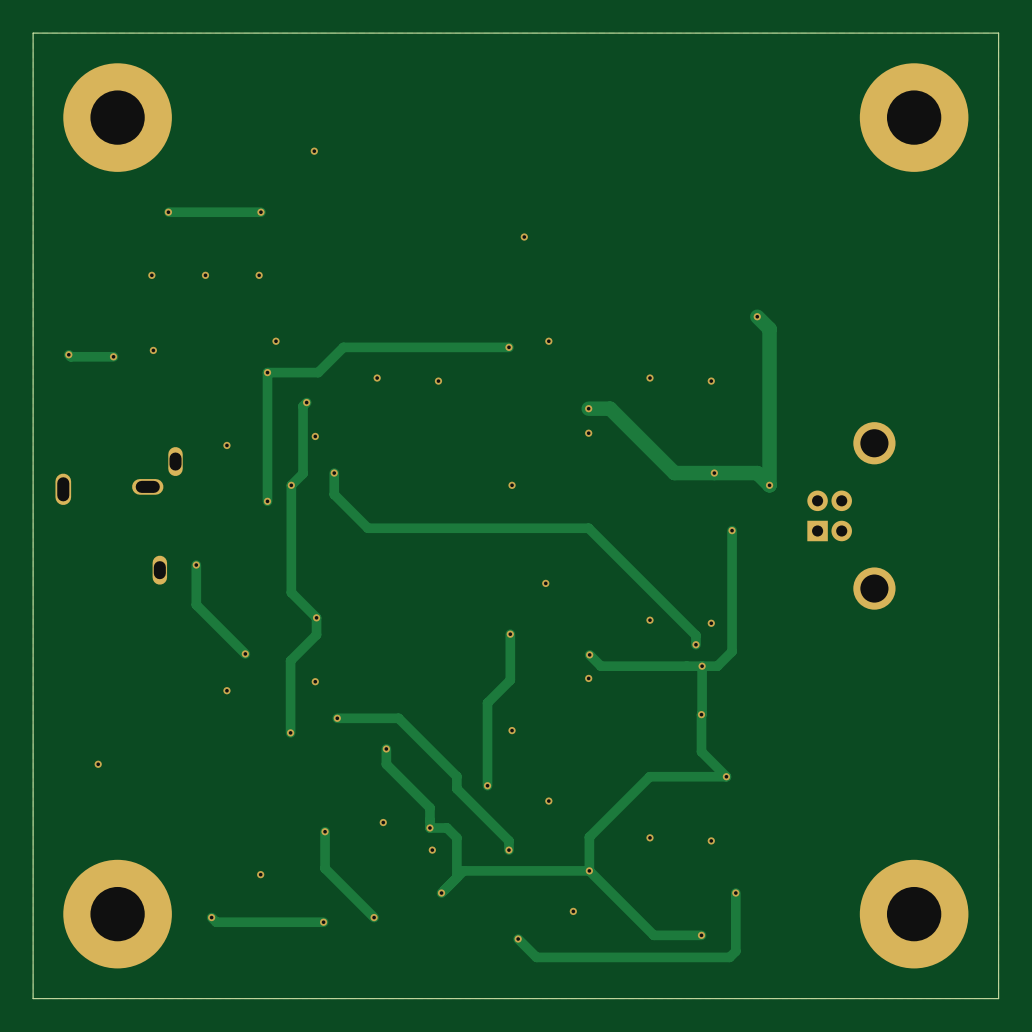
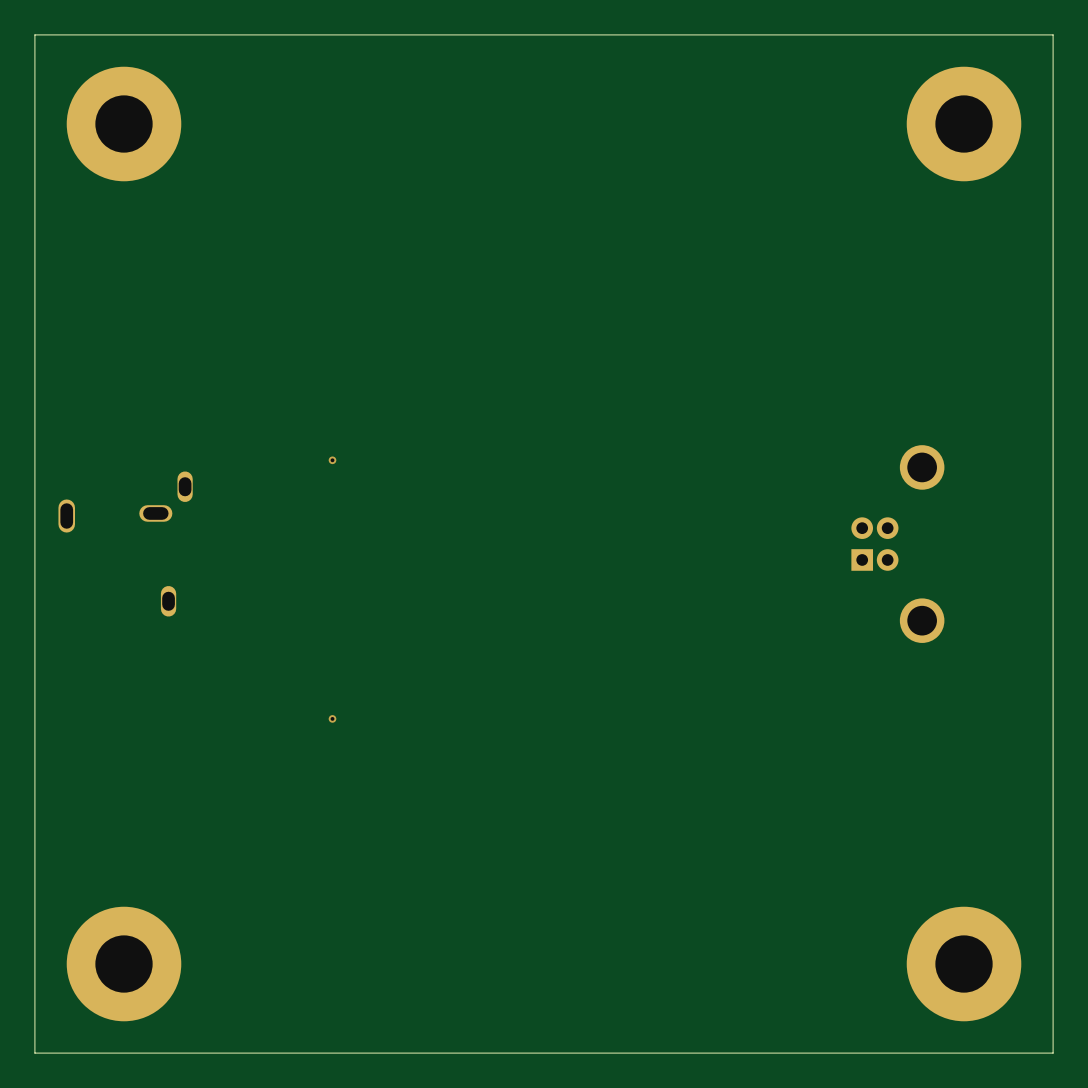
via: (314, 151) -> none
via: (168, 212) -> none
track: (260, 212) (168, 212) -> none
via: (260, 212) -> none
via: (524, 237) -> none
via: (151, 275) -> none
via: (205, 275) -> none
via: (259, 275) -> none
track: (757, 316) (769, 328) (769, 485) (757, 473) (674, 473) (610, 408) (588, 408) -> none
via: (757, 316) -> none
via: (276, 341) -> none
via: (548, 341) -> none
track: (508, 347) (343, 347) (318, 372) (267, 372) (267, 501) -> none
via: (508, 347) -> none
via: (153, 350) -> none
track: (68, 354) (70, 356) (113, 356) -> none
via: (68, 354) -> none
via: (113, 356) -> none
via: (267, 372) -> none
via: (377, 378) -> none
via: (649, 378) -> none
via: (438, 381) -> none
via: (711, 381) -> none
track: (306, 402) (303, 406) (303, 473) (291, 485) (291, 592) (316, 617) (316, 634) (290, 660) (290, 732) -> none
via: (306, 402) -> none
via: (588, 408) -> none
via: (588, 433) -> none
via: (226, 445) -> none
track: (334, 473) (334, 494) (367, 528) (588, 528) (695, 635) (695, 644) -> none
via: (334, 473) -> none
via: (714, 473) -> none
via: (291, 485) -> none
via: (512, 485) -> none
via: (769, 485) -> none
via: (267, 501) -> none
track: (732, 530) (732, 651) (717, 666) (600, 666) (589, 654) -> none
via: (732, 530) -> none
track: (196, 565) (196, 604) (245, 653) -> none
via: (196, 565) -> none
via: (545, 583) -> none
via: (316, 617) -> none
via: (649, 620) -> none
via: (711, 623) -> none
track: (510, 634) (510, 680) (487, 702) (487, 785) -> none
via: (510, 634) -> none
via: (695, 644) -> none
via: (245, 653) -> none
via: (589, 654) -> none
track: (702, 666) (701, 751) (726, 776) (649, 776) (589, 837) (589, 870) -> none
via: (702, 666) -> none
via: (588, 678) -> none
via: (226, 690) -> none
via: (701, 714) -> none
track: (337, 718) (398, 718) (456, 776) (456, 788) (508, 840) (508, 850) -> none
via: (337, 718) -> none
via: (512, 730) -> none
via: (290, 732) -> none
track: (386, 748) (386, 764) (429, 807) (429, 827) (446, 827) (456, 837) (456, 877) -> none
via: (386, 748) -> none
via: (98, 764) -> none
via: (726, 776) -> none
via: (487, 785) -> none
via: (548, 801) -> none
via: (383, 822) -> none
via: (429, 827) -> none
track: (325, 831) (325, 868) (374, 917) -> none
via: (325, 831) -> none
via: (649, 837) -> none
via: (711, 840) -> none
via: (432, 850) -> none
via: (508, 850) -> none
track: (589, 870) (653, 935) (701, 935) -> none
track: (589, 870) (463, 870) (441, 893) -> none
via: (589, 870) -> none
via: (260, 874) -> none
via: (441, 893) -> none
track: (735, 893) (735, 951) (729, 957) (536, 957) (518, 939) -> none
via: (735, 893) -> none
via: (573, 911) -> none
track: (211, 917) (216, 922) (323, 922) -> none
via: (211, 917) -> none
via: (374, 917) -> none
via: (323, 922) -> none
via: (701, 935) -> none
via: (518, 939) -> none

